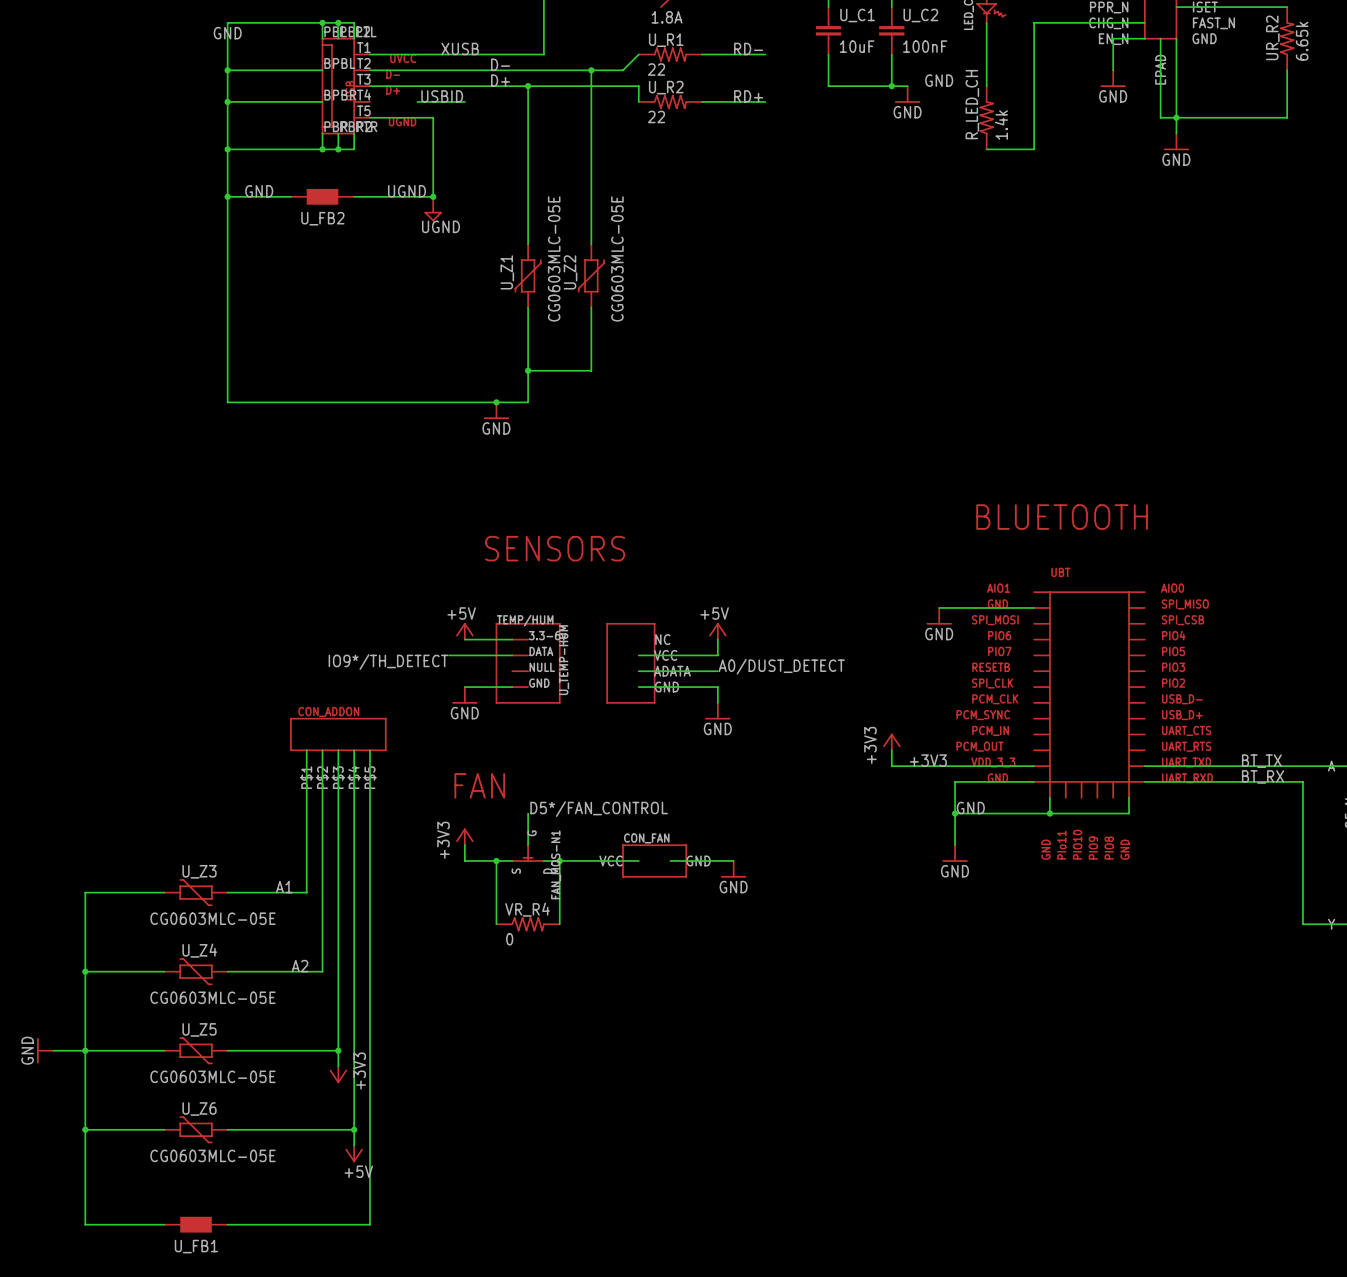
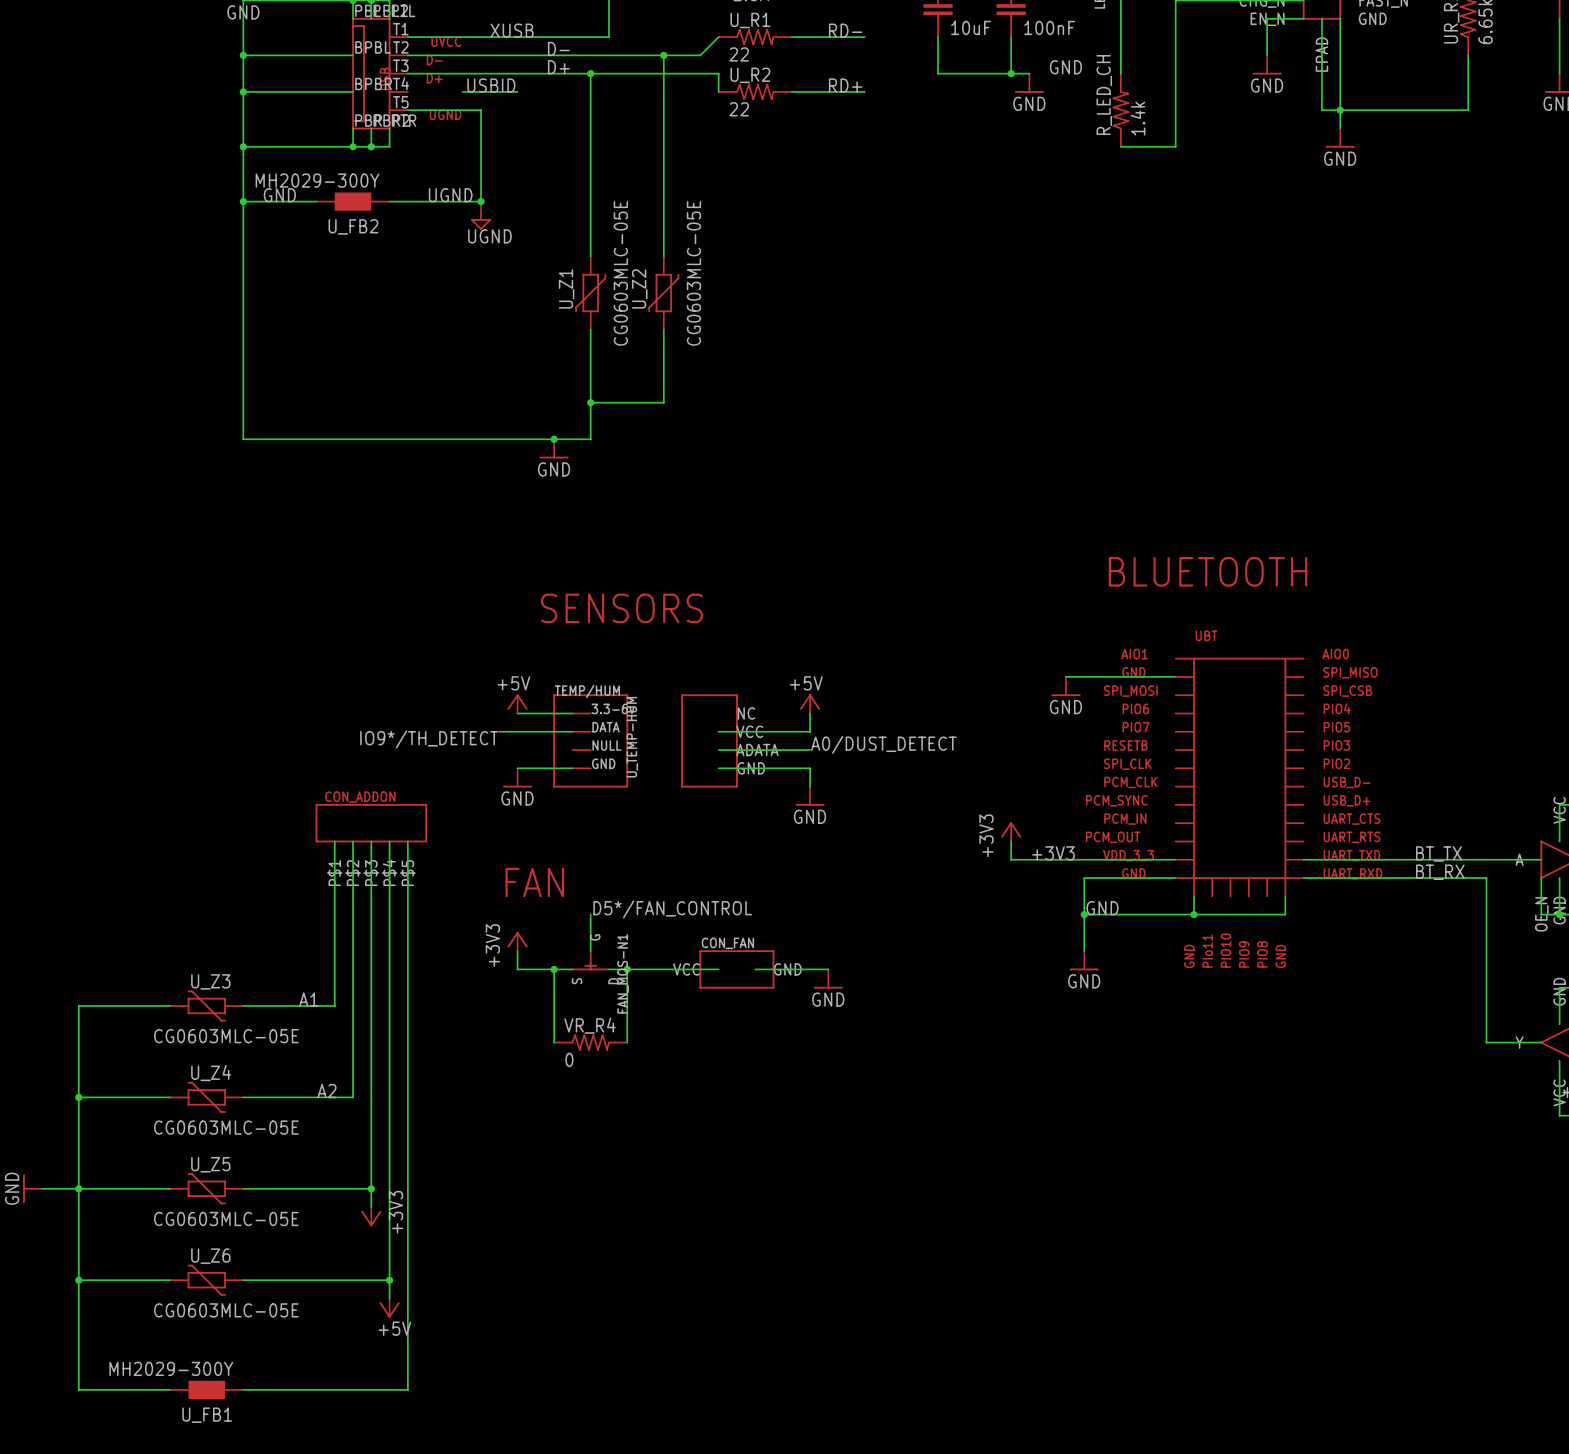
U_FB2 value: none -> MH2029-300Y (317, 180)
U_FB1 value: none -> MH2029-300Y (171, 1368)

